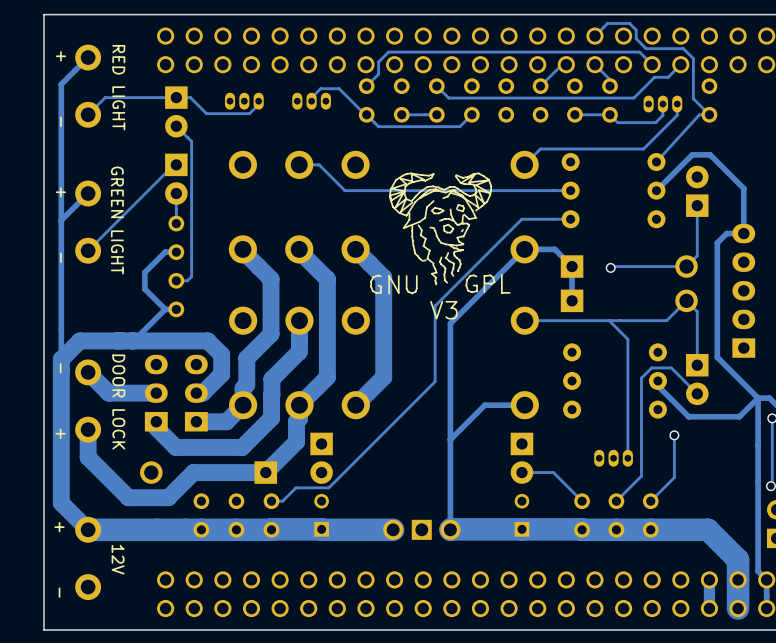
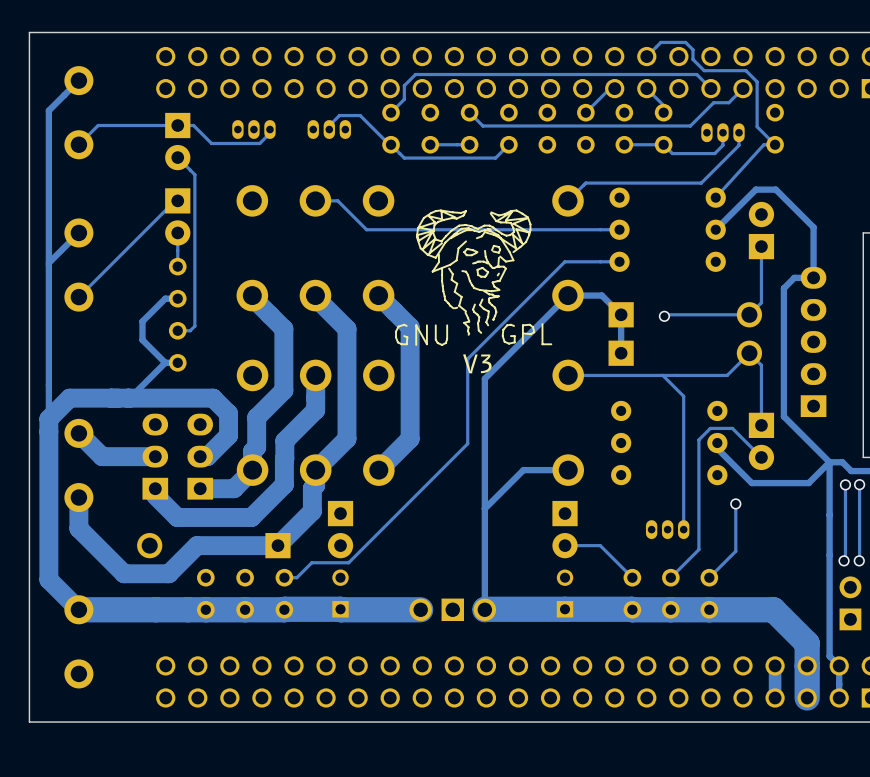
text: RED LIGHT (118, 87) -> none
text: + - (60, 89) -> none
text: GREEN LIGHT (117, 220) -> none
text: + - (60, 224) -> none
text: + - (60, 401) -> none
text: DOOR LOCK (118, 401) -> none
text: + - (59, 559) -> none
text: 12V (118, 559) -> none

